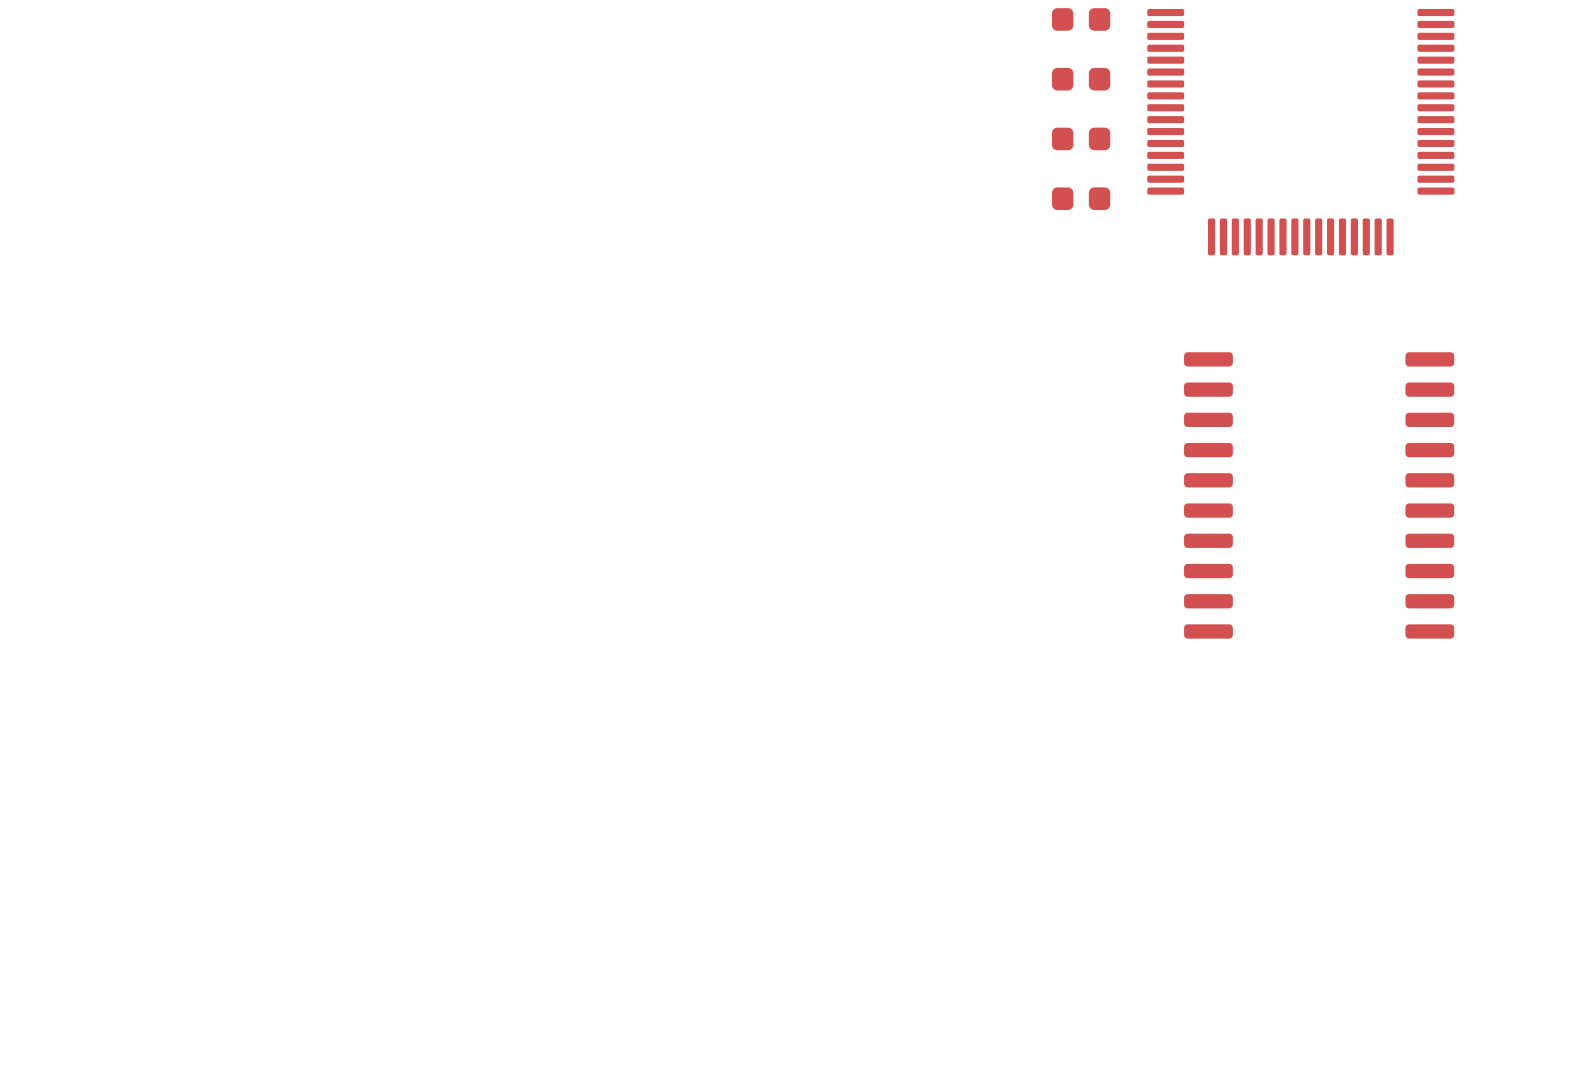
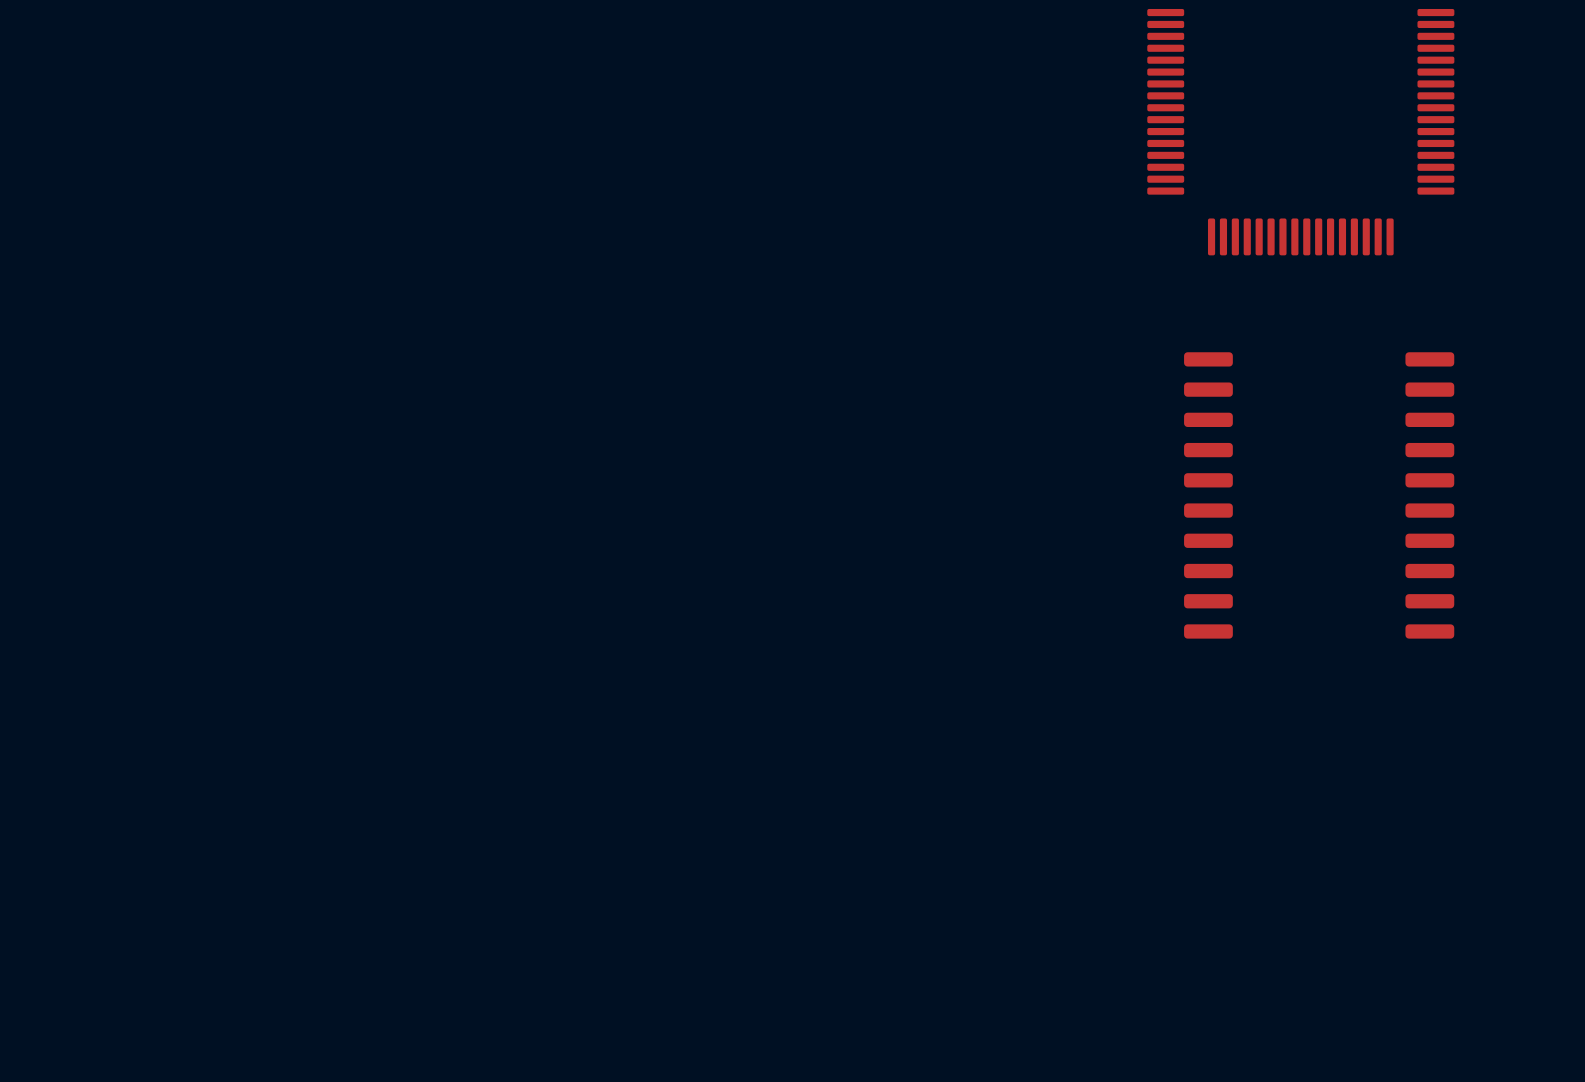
part: (1081, 19) -> none
part: (1081, 79) -> none
part: (1081, 138) -> none
part: (1081, 198) -> none

